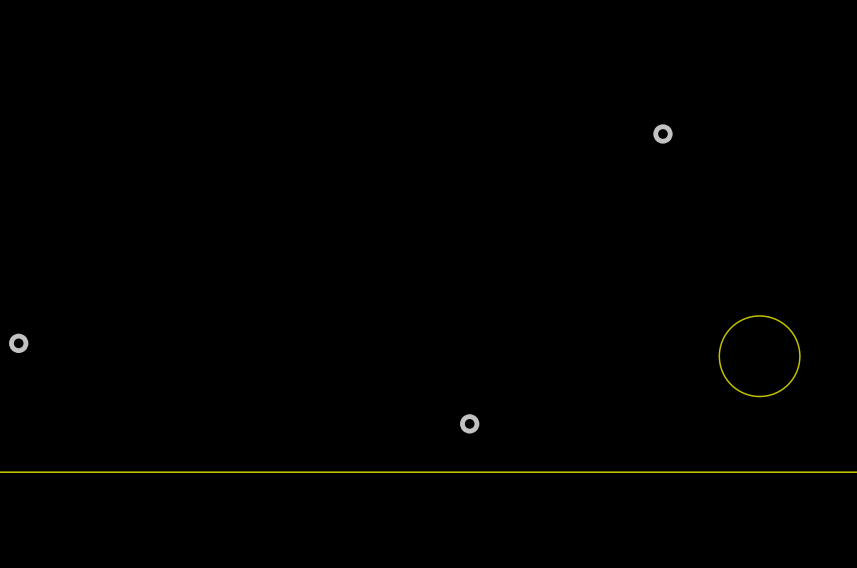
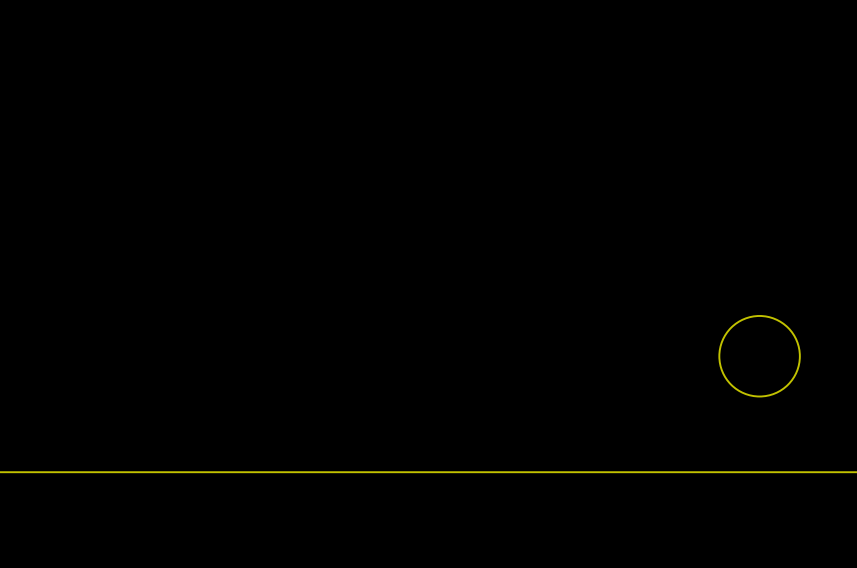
via: (662, 133) -> none
via: (18, 343) -> none
via: (469, 423) -> none

